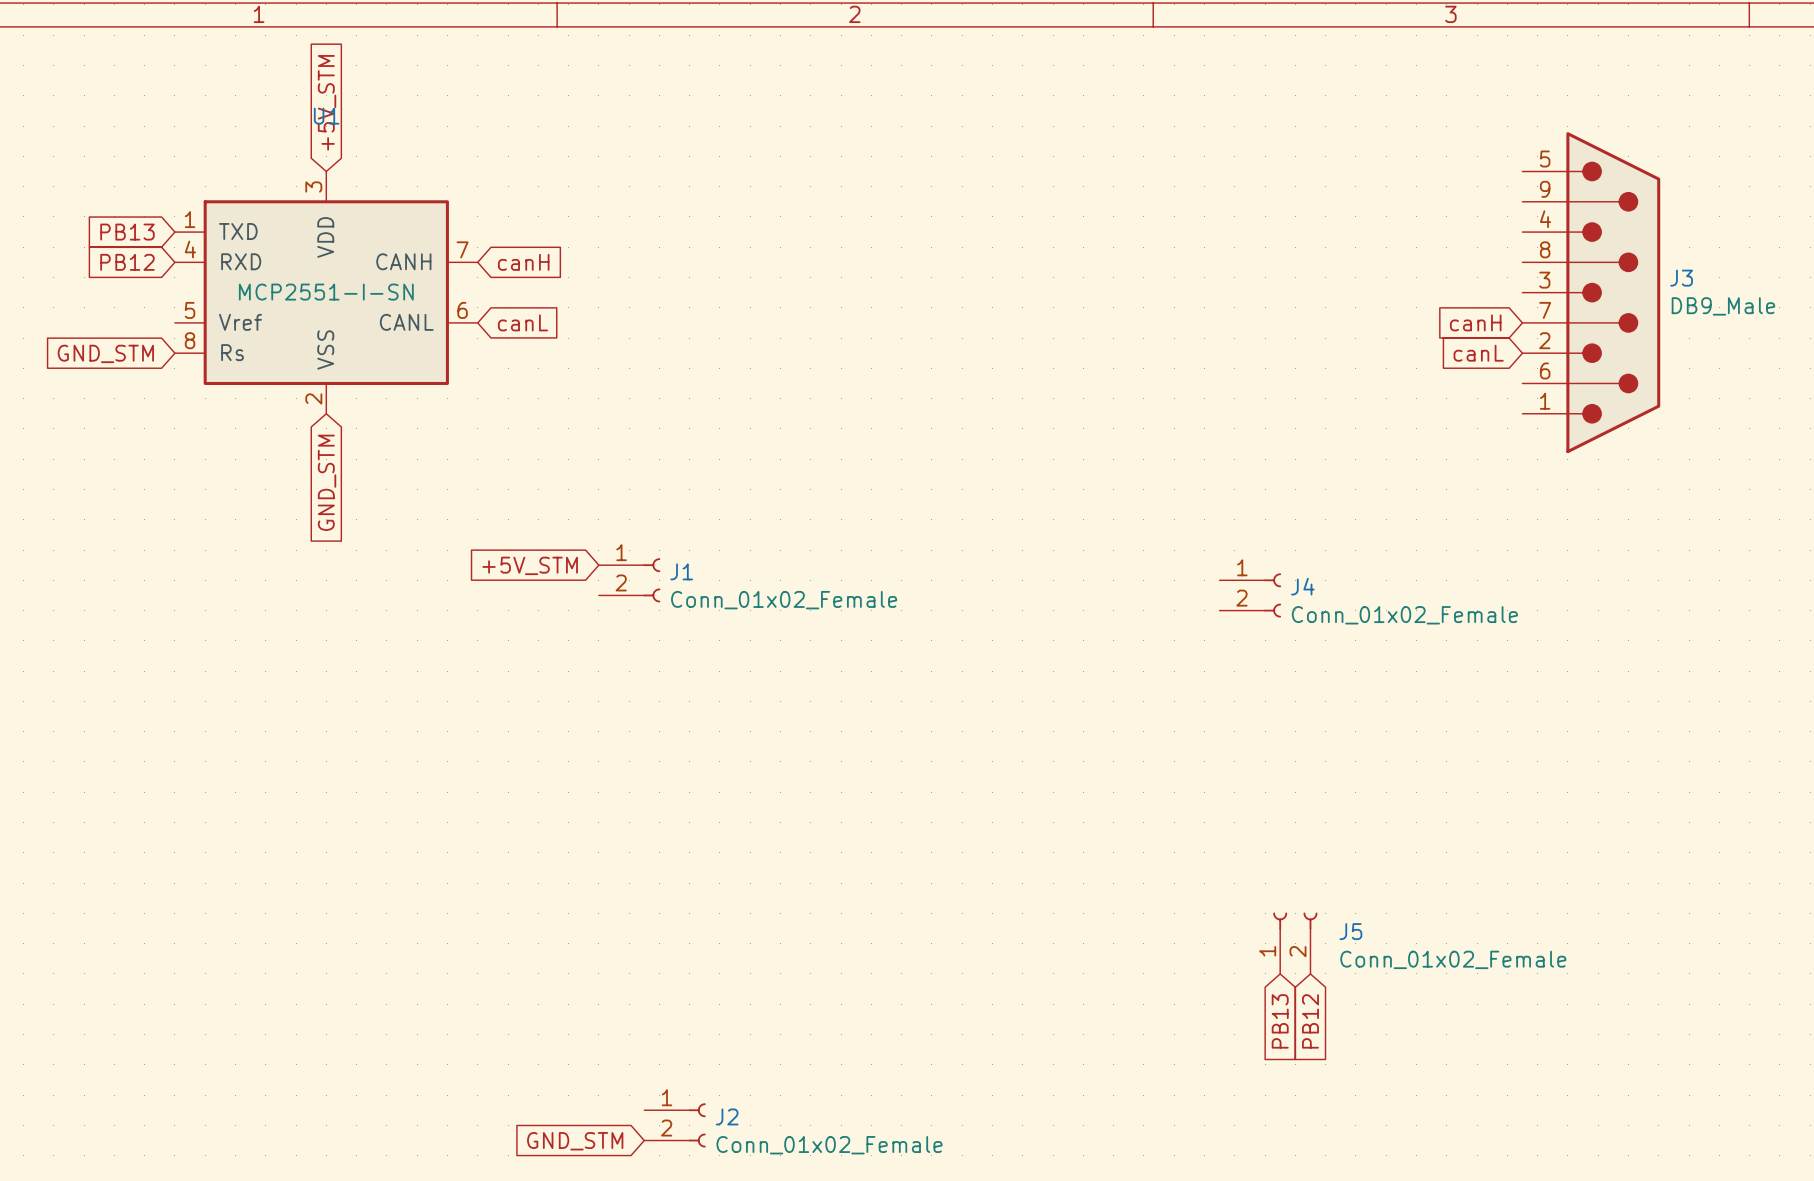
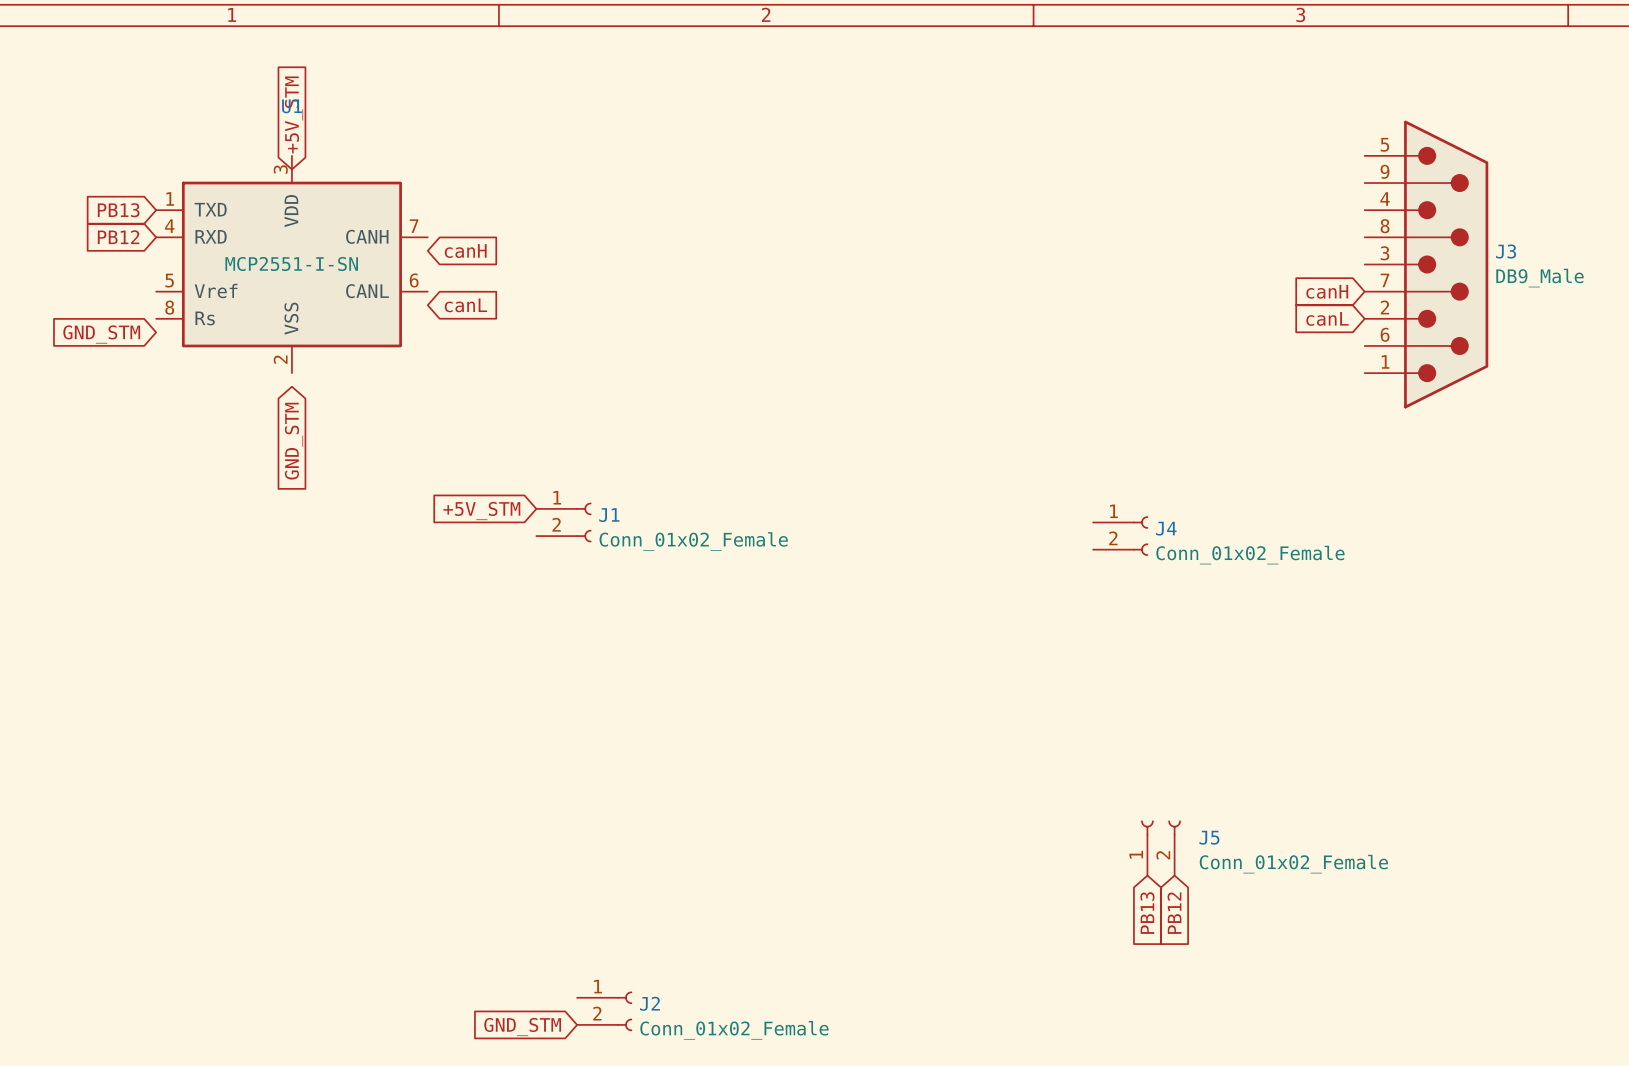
global label position: +5V_STM (327, 102) -> +5V_STM (294, 114)
global label position: canH (523, 262) -> canH (465, 251)
global label position: canL (522, 322) -> canL (465, 305)
global label position: GND_STM (105, 353) -> GND_STM (101, 334)
global label position: GND_STM (327, 482) -> GND_STM (294, 441)

